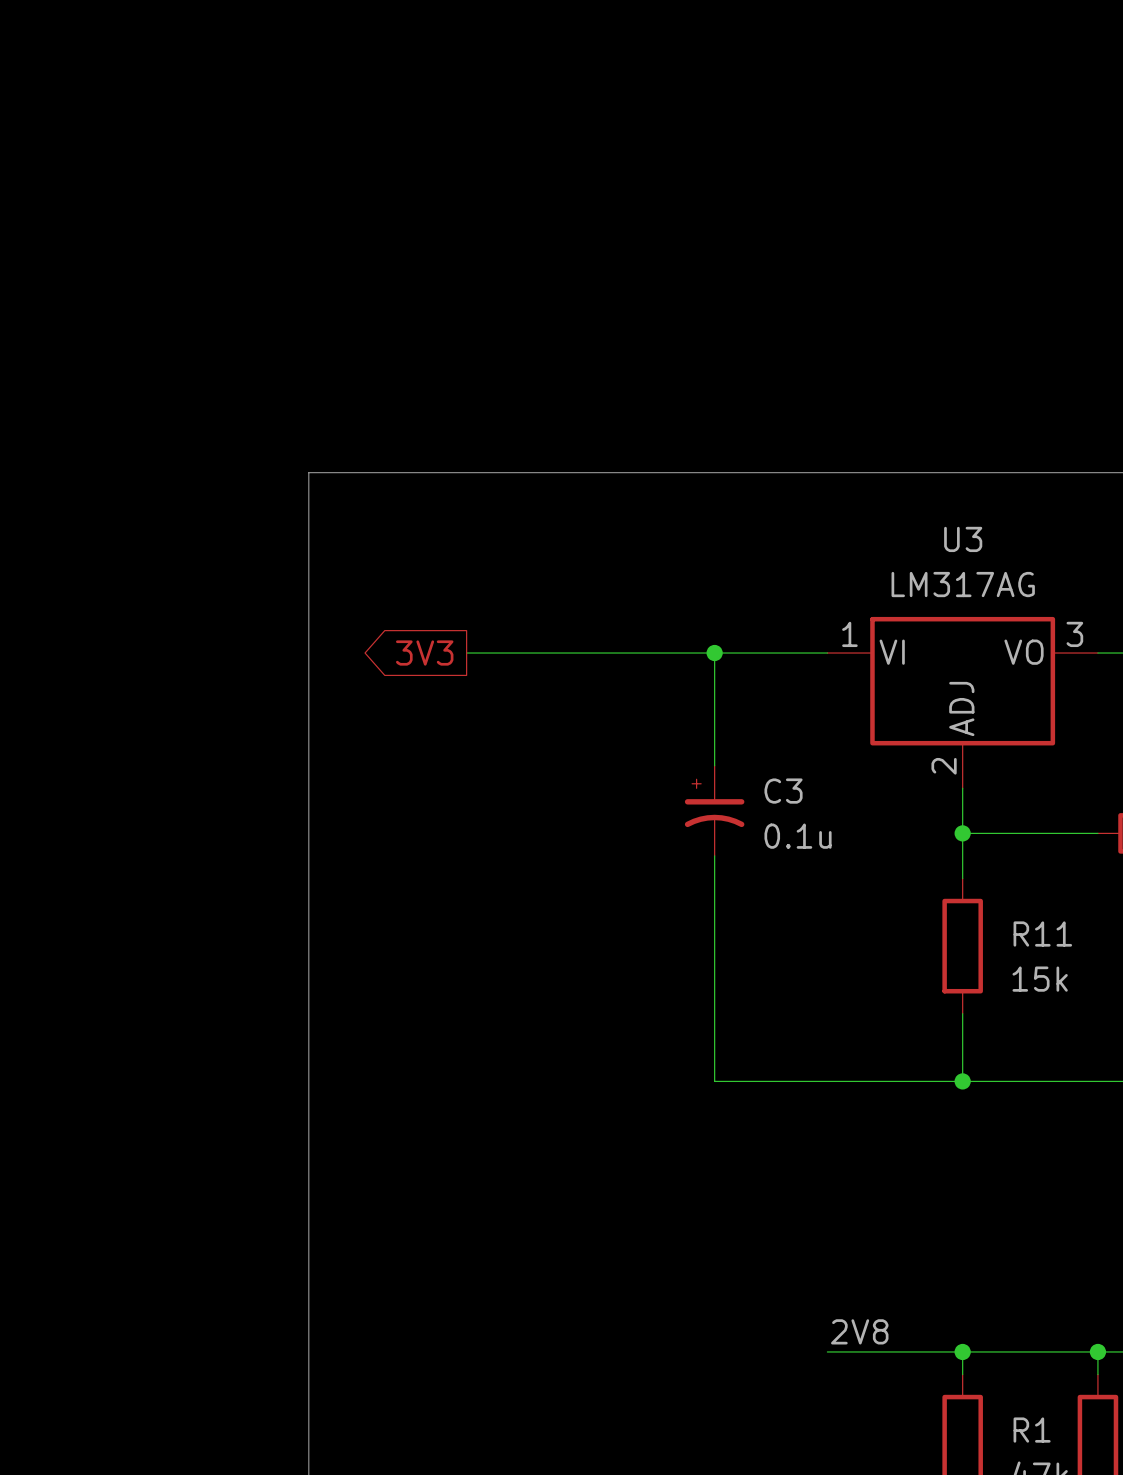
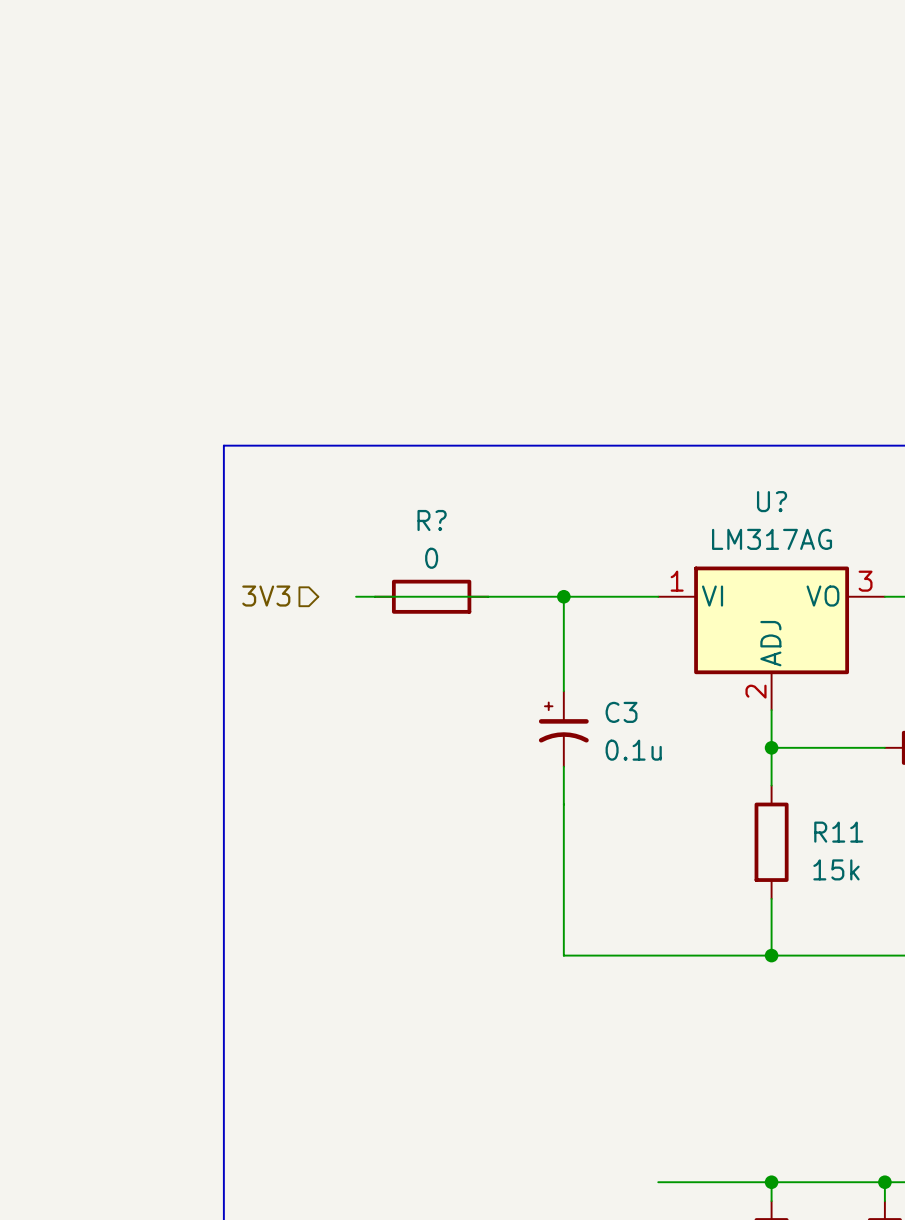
U3 name: U3 (963, 539) -> U? (772, 501)
hierarchical label: none -> 3V3 (266, 596)
global label: 3V3 (424, 653) -> none
R?: none -> 0 (431, 596)
label: 2V8 (859, 1331) -> none

